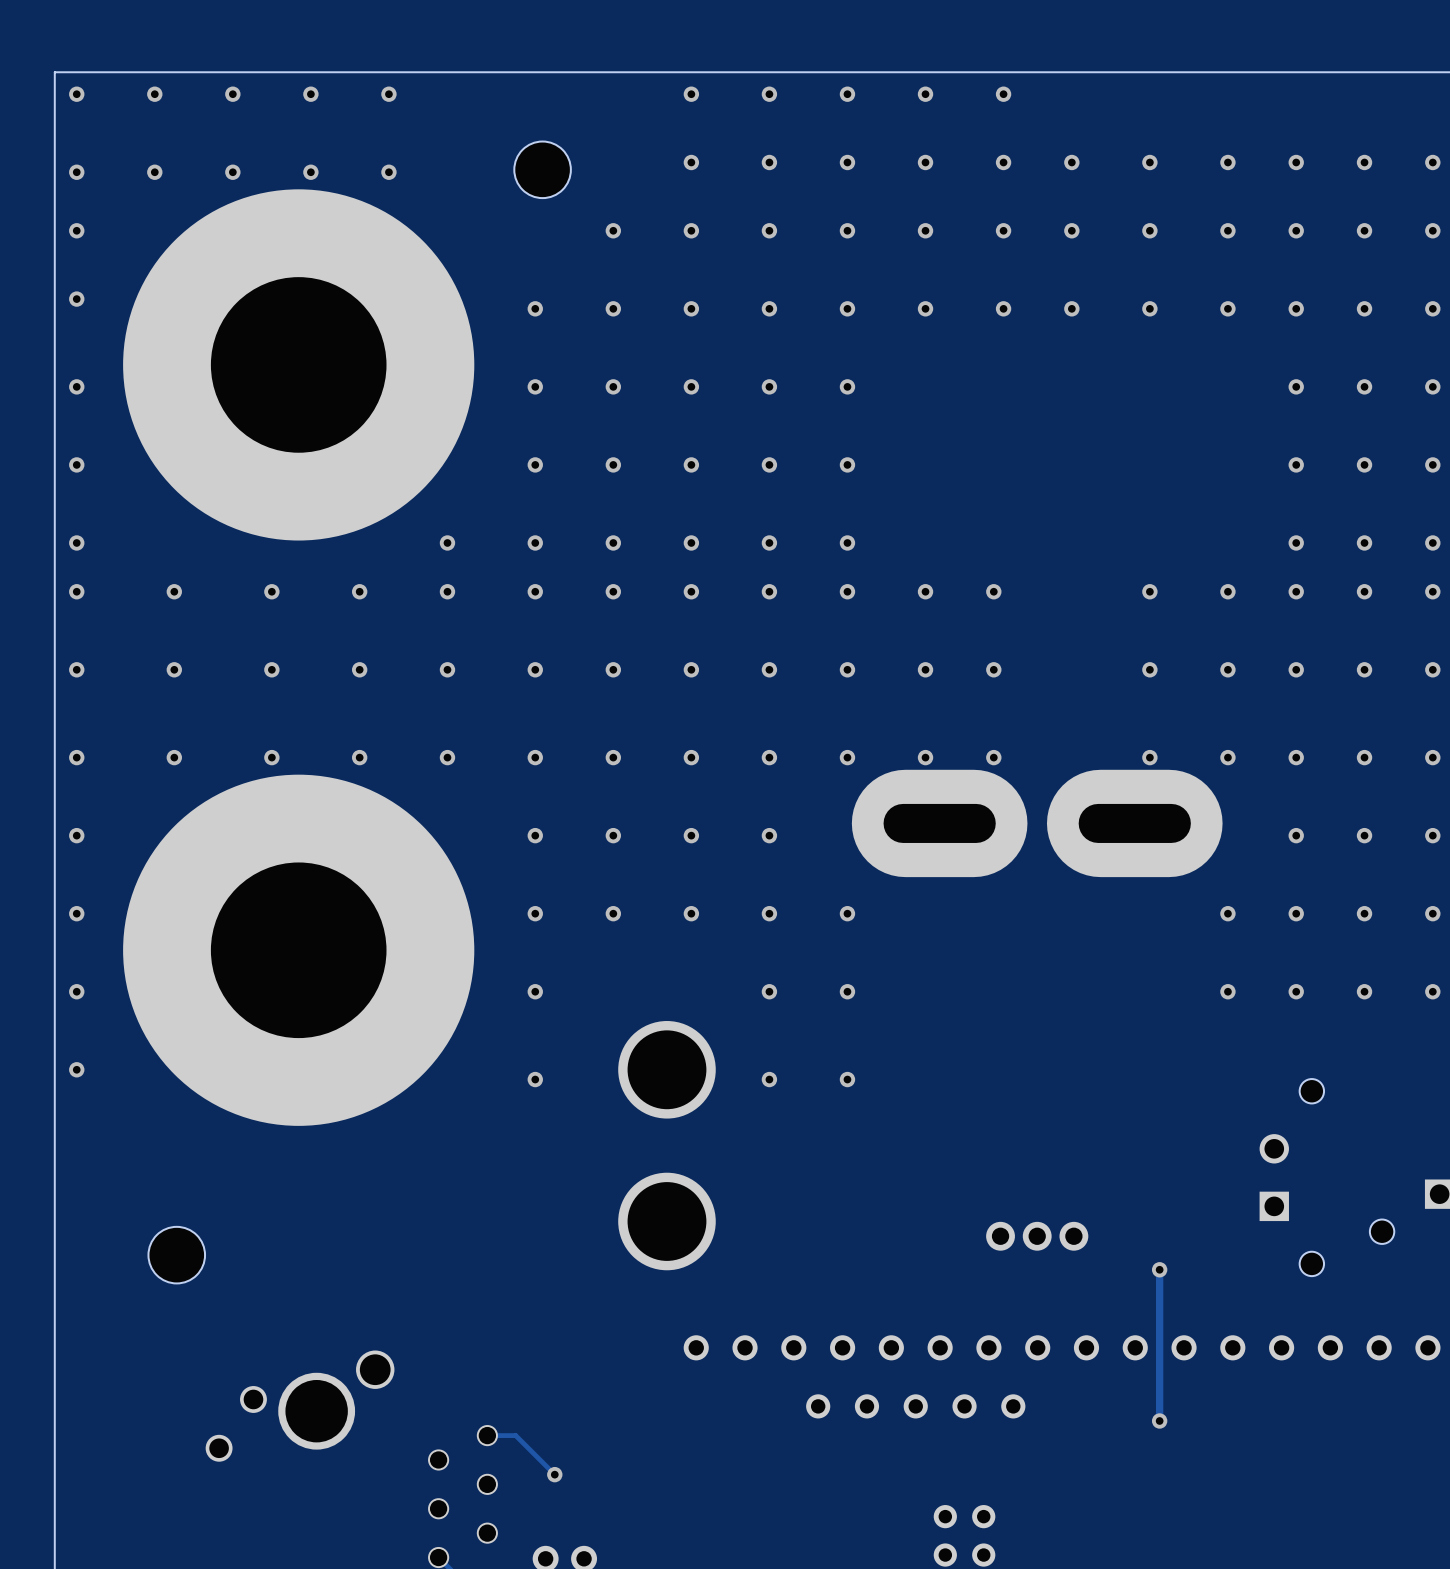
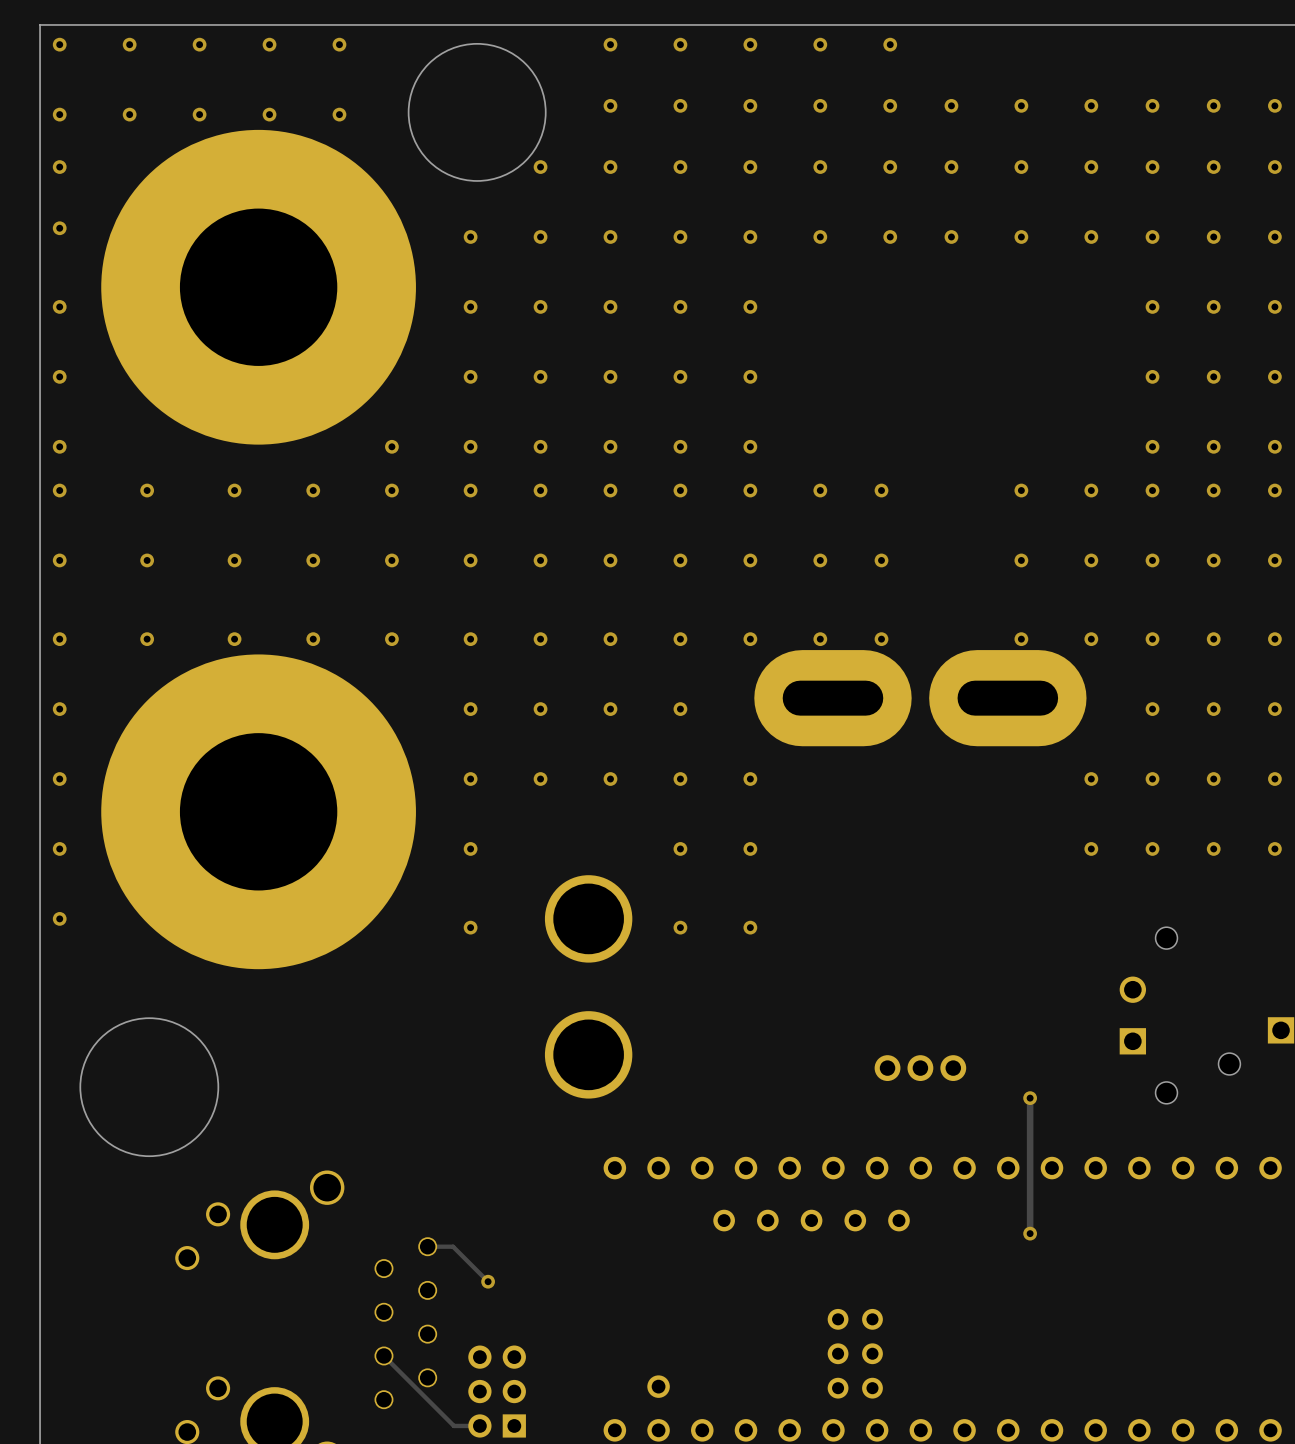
round board edge: none -> [407, 42, 547, 182]
part: (542, 169) -> none
round board edge: none -> [79, 1017, 220, 1158]
part: (176, 1255) -> none

